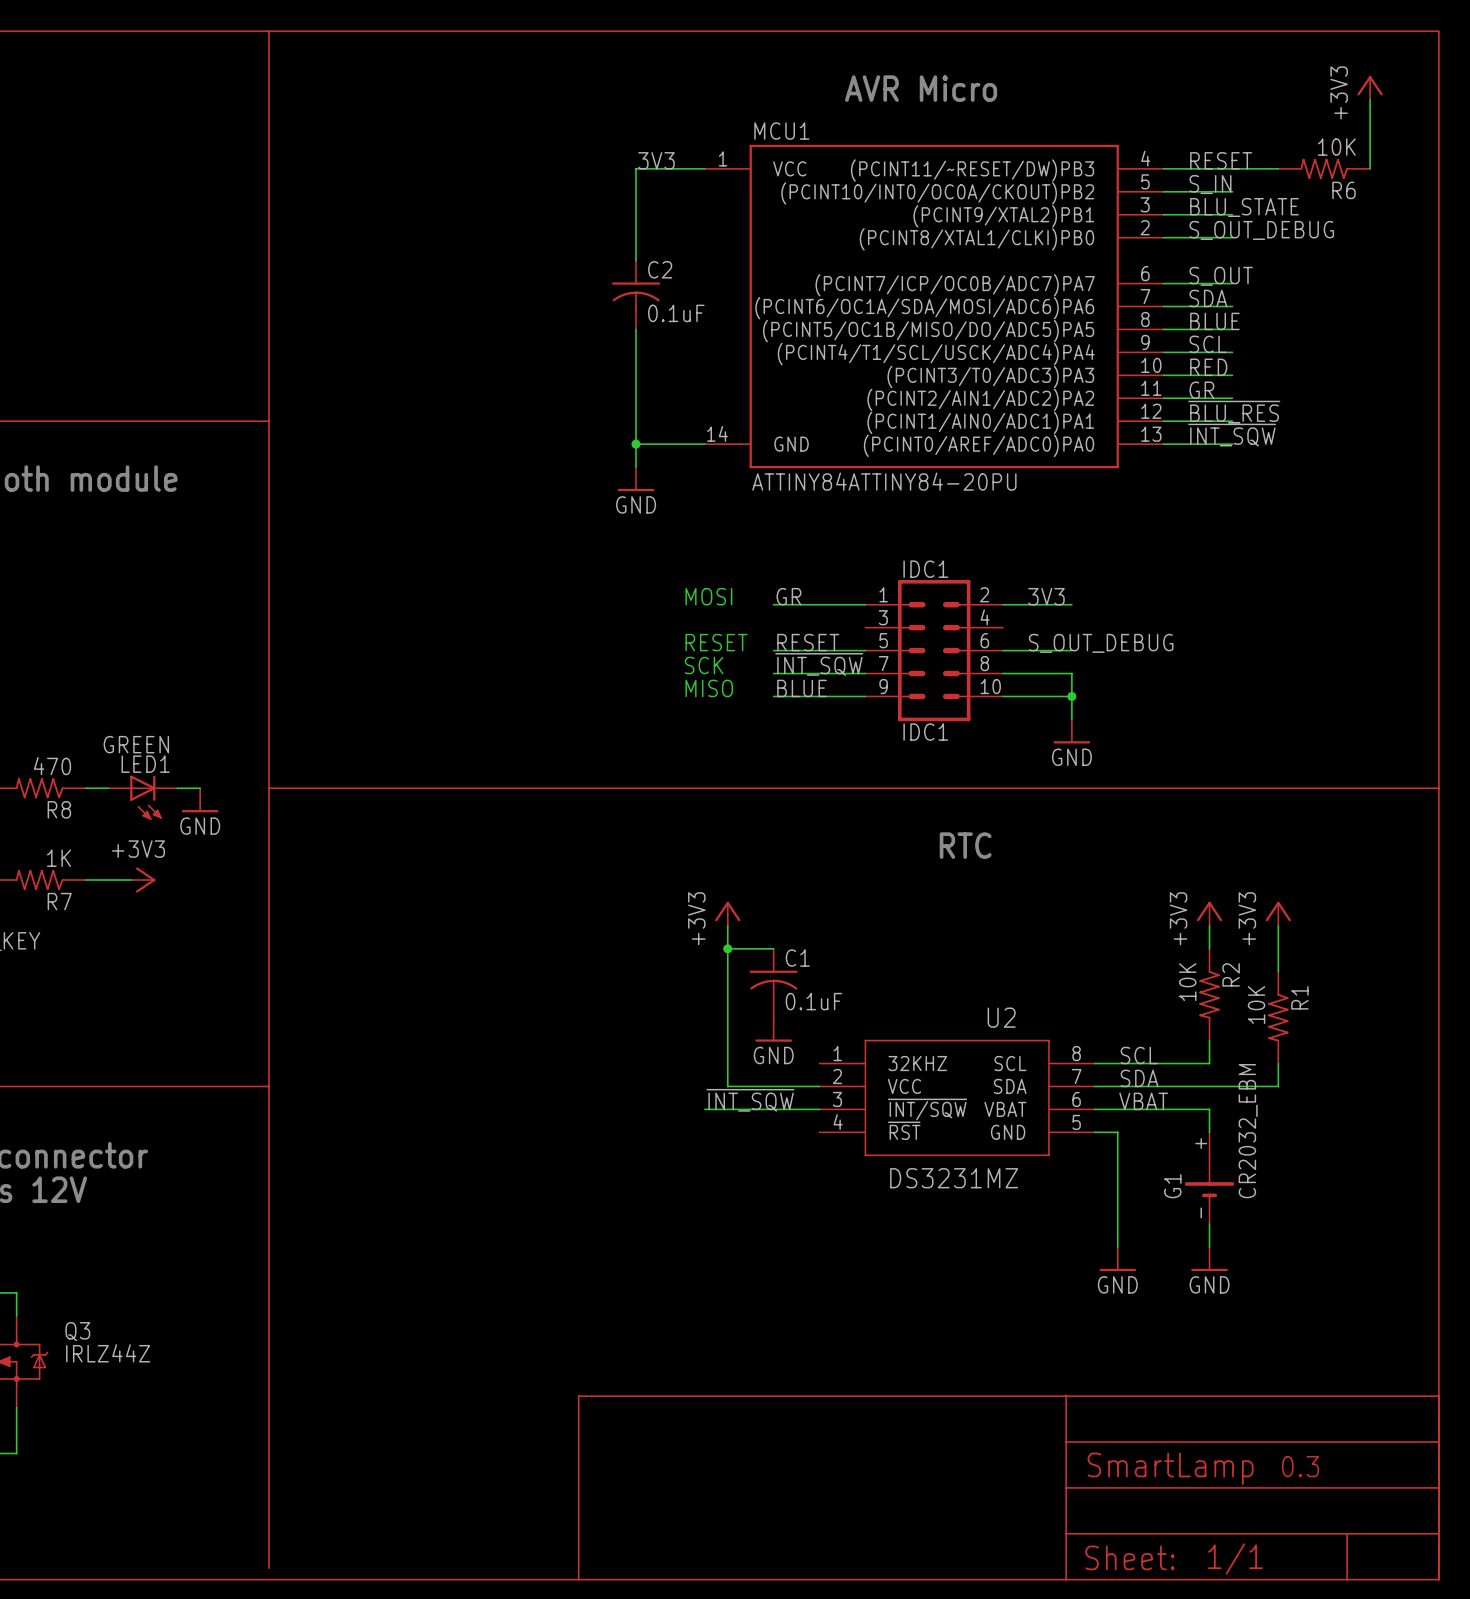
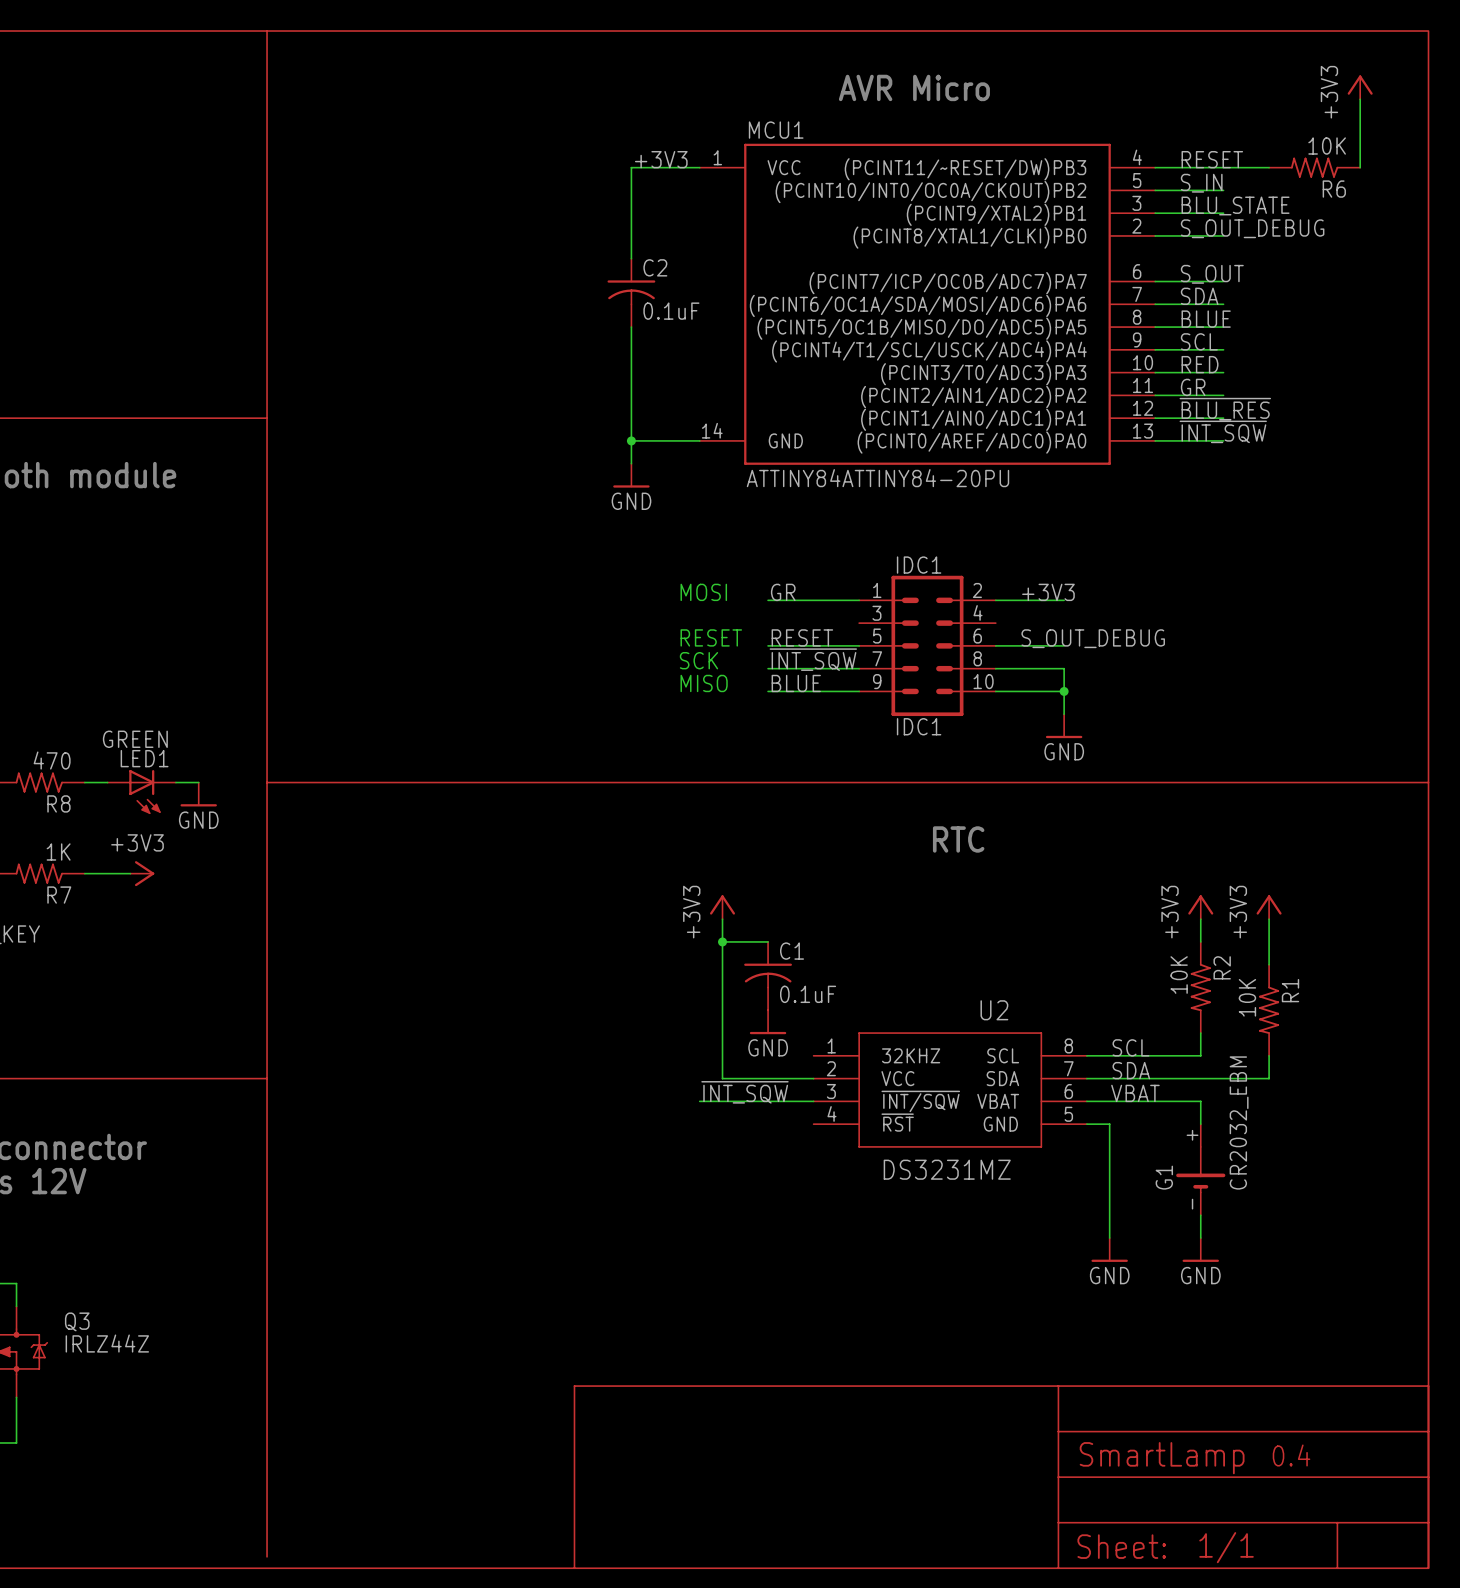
label: 3V3 (656, 160) -> +3V3 (661, 159)
label: 3V3 (1046, 596) -> +3V3 (1048, 592)
text: 0.3 (1300, 1466) -> 0.4 (1291, 1455)

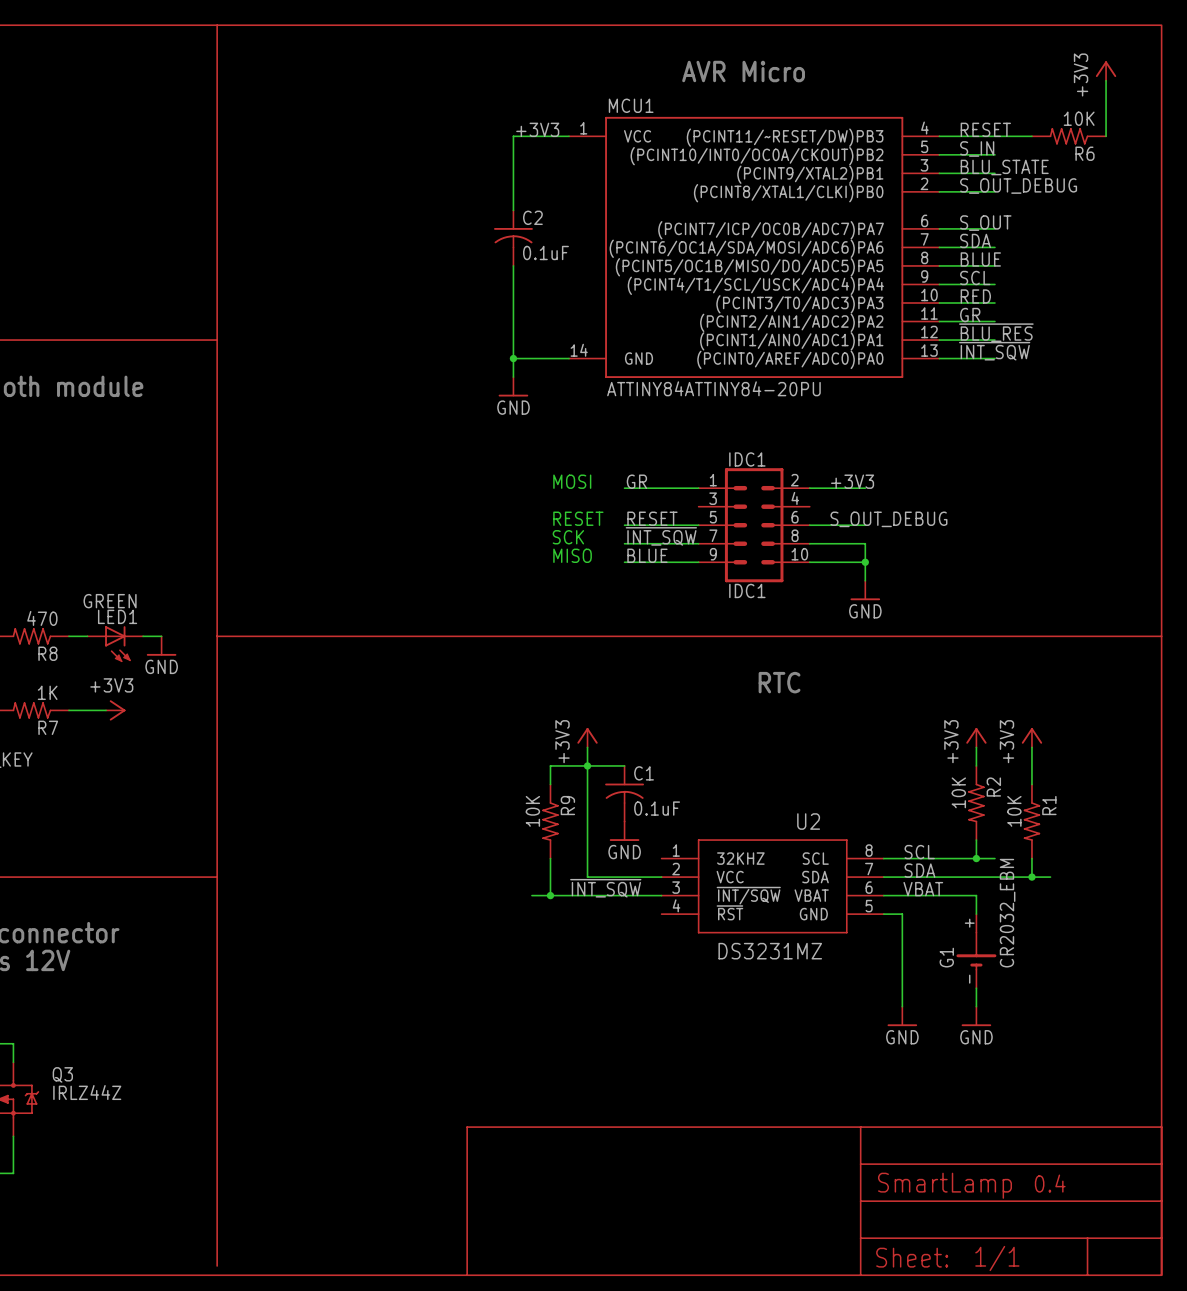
wire: none -> (587, 765) (550, 765) (550, 784)
R9: none -> 10K (550, 821)
wire: none -> (550, 858) (550, 895)
wire: none -> (976, 858) (994, 858)
junction: none -> (976, 858)
wire: none -> (1031, 877) (1050, 877)
junction: none -> (1031, 877)
wire: none -> (531, 895) (569, 895)
junction: none -> (550, 895)

